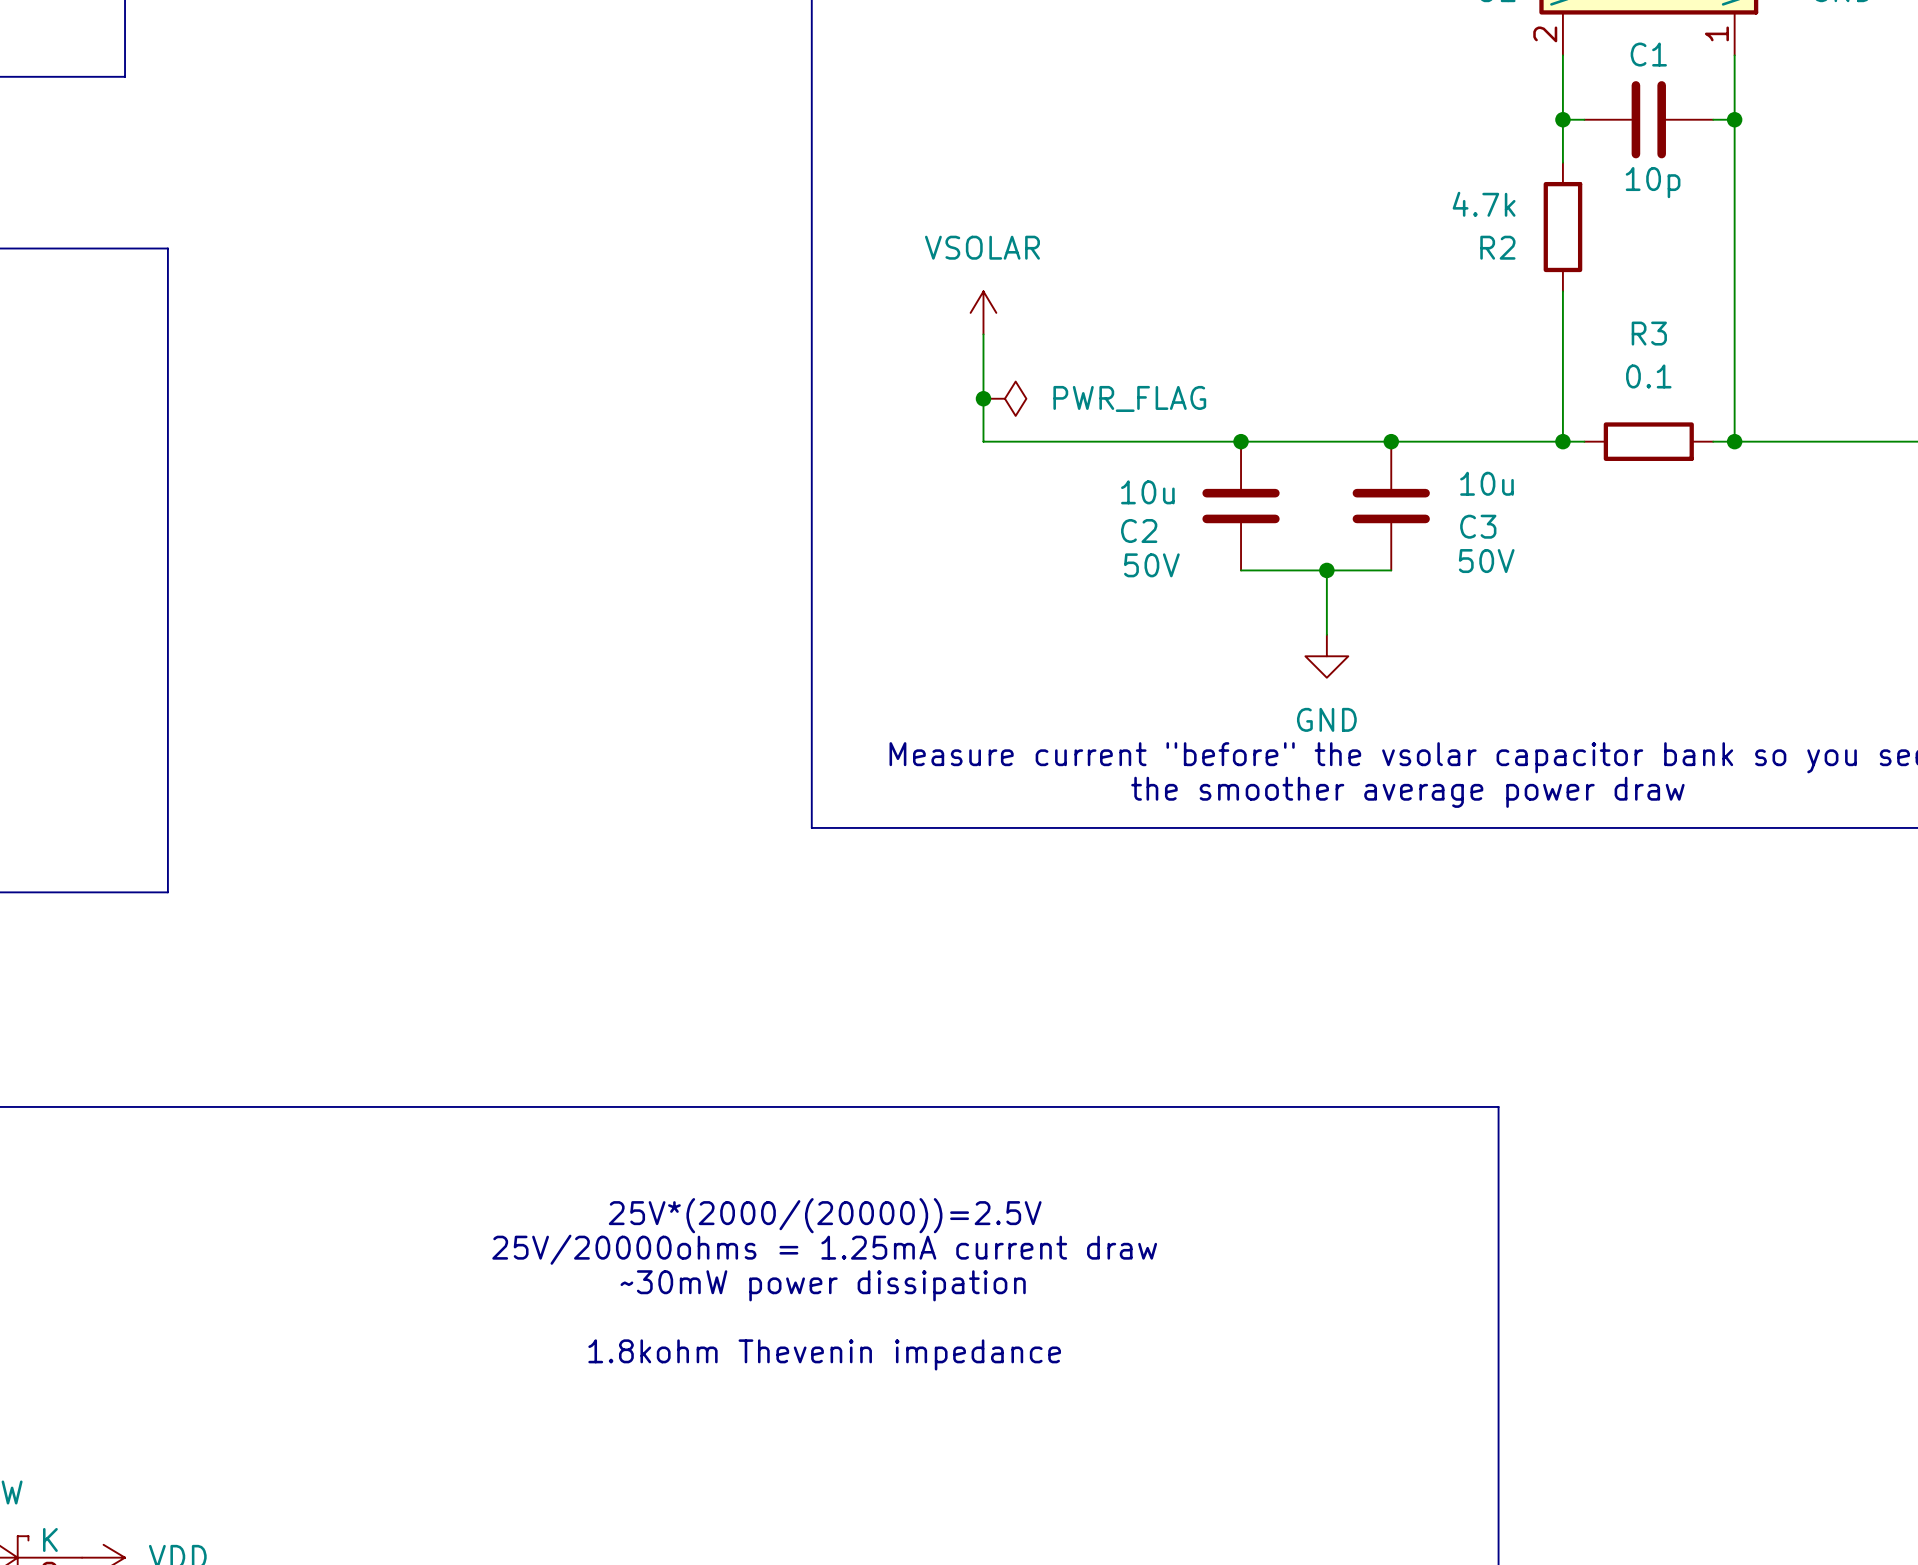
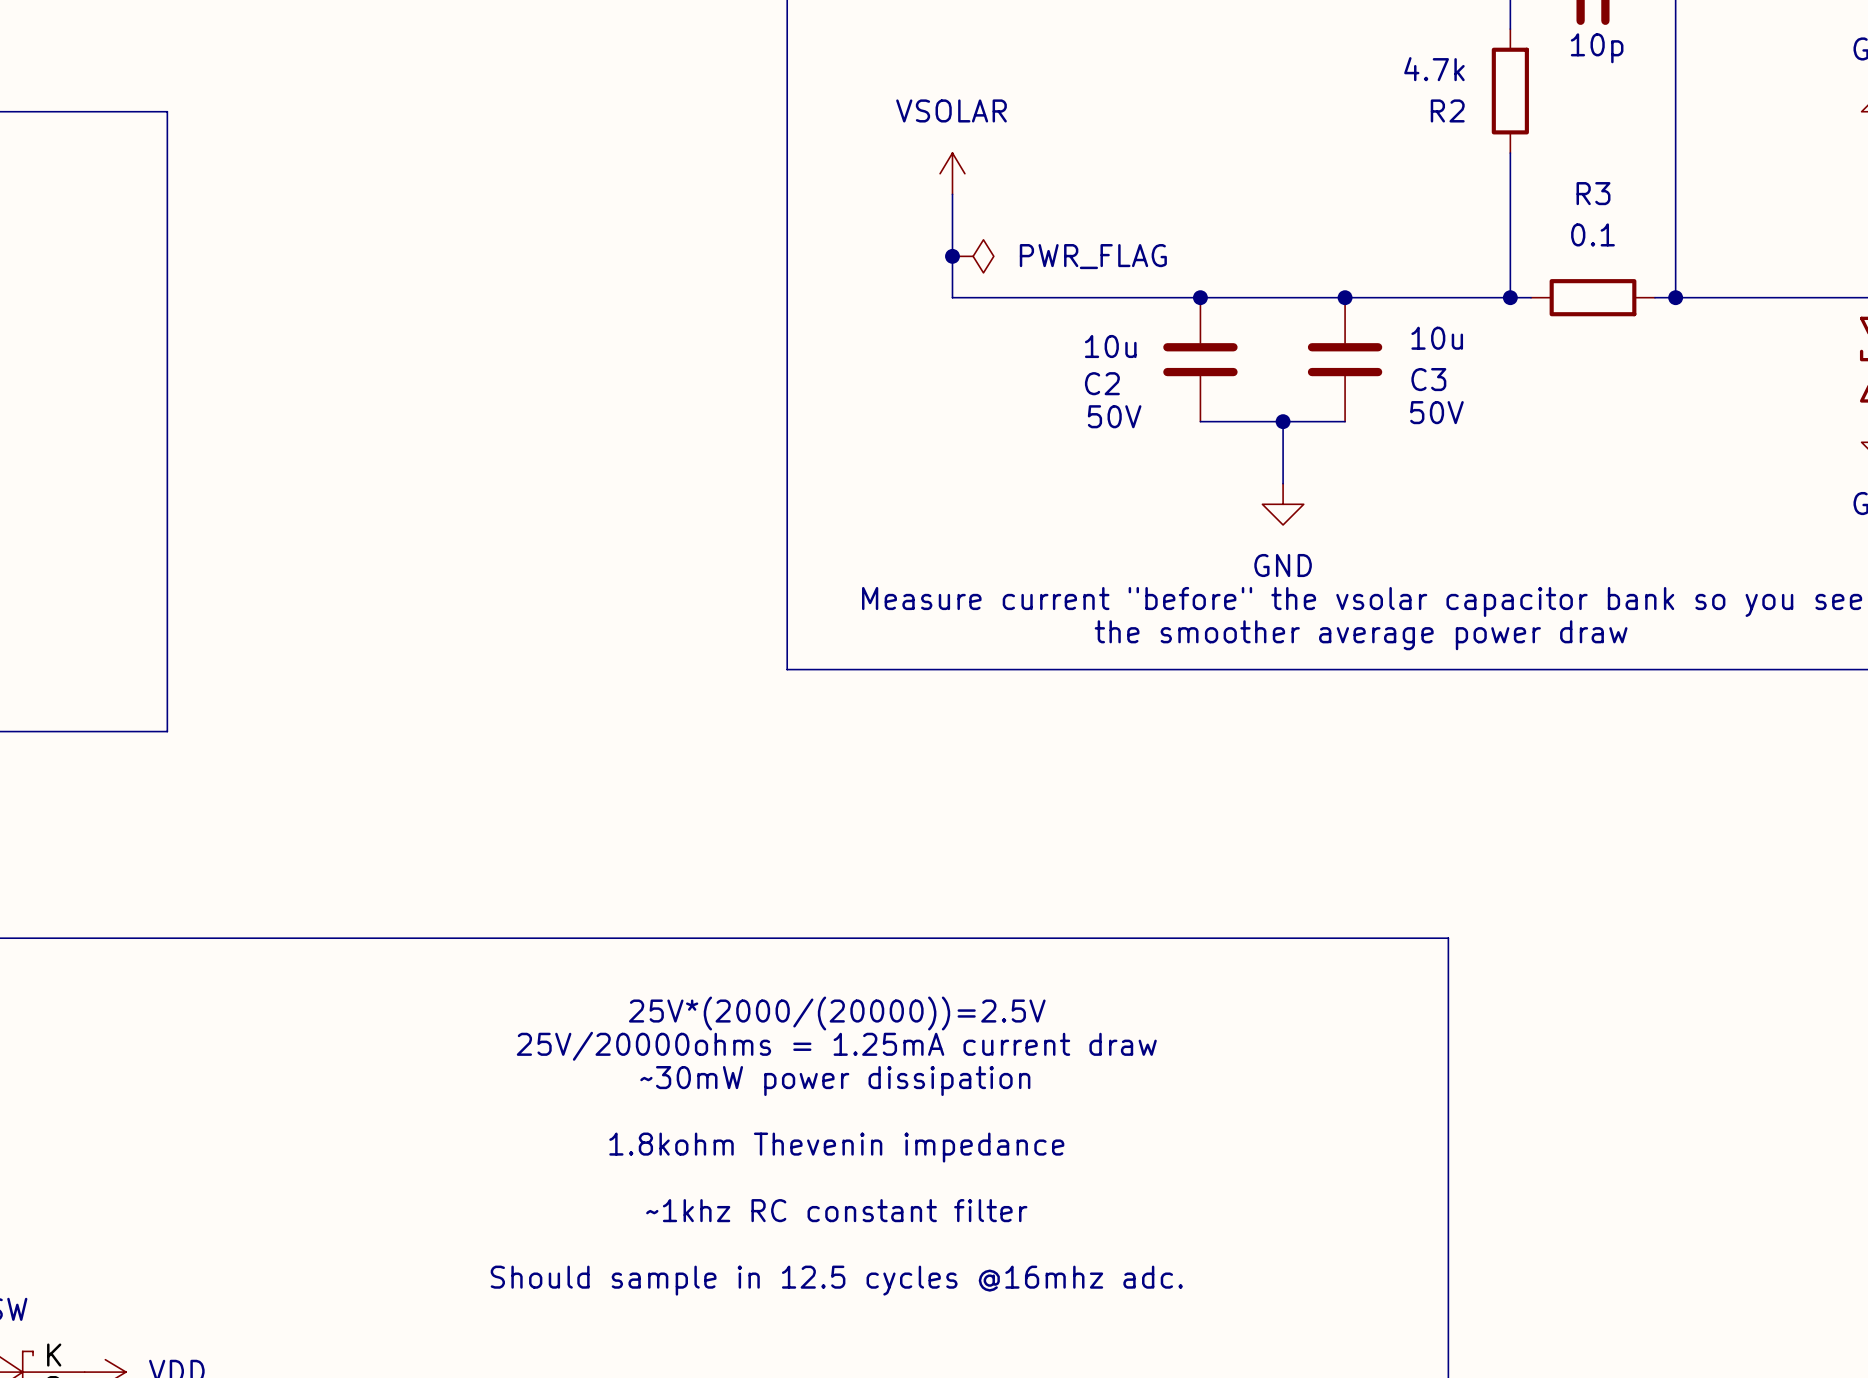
text position: 25V*(2000/(20000))=2.5V (825, 1215) -> 25V*(2000/(20000))=2.5V (837, 1013)
text position: 25V/20000ohms = 1.25mA current draw (824, 1249) -> 25V/20000ohms = 1.25mA current draw (836, 1046)
text position: ~30mW power dissipation (823, 1285) -> ~30mW power dissipation (835, 1081)
text position: 1.8kohm Thevenin impedance (824, 1354) -> 1.8kohm Thevenin impedance (836, 1147)
text: none -> ~1khz RC constant filter (836, 1210)
text: none -> Should sample in 12.5 cycles @16mhz adc. (836, 1280)

